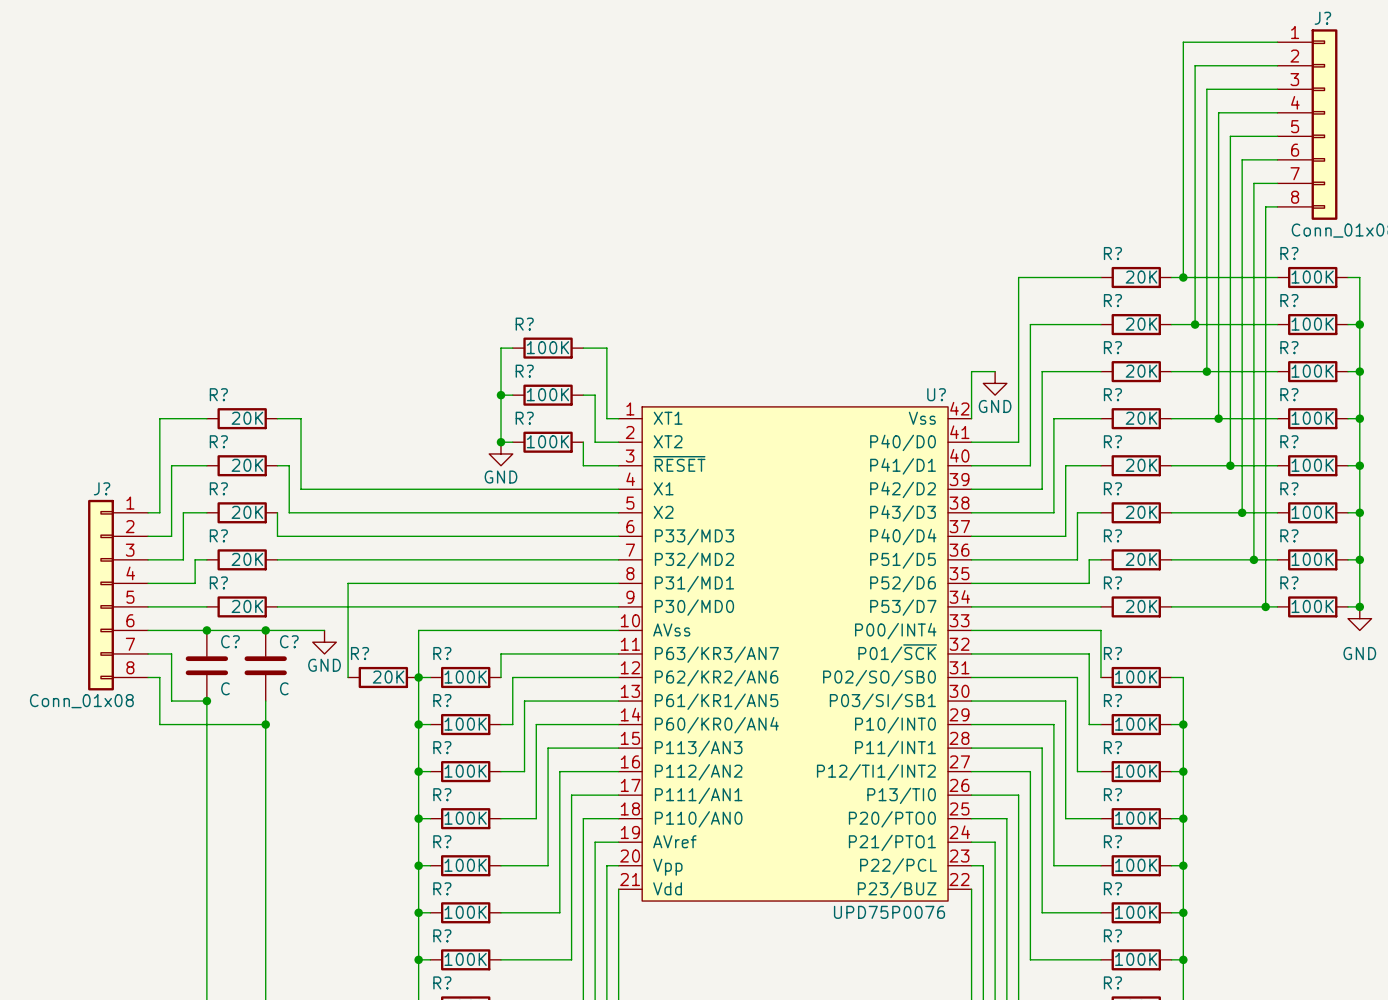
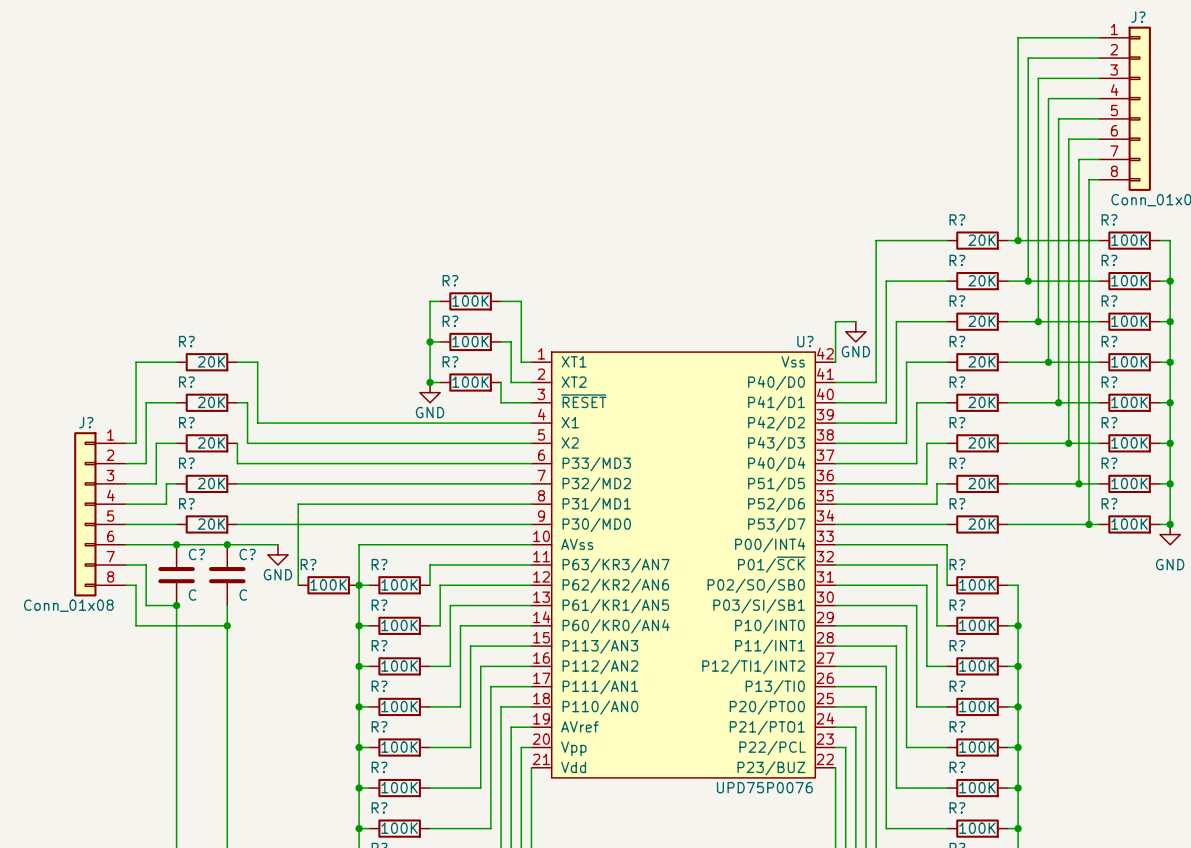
R? value: 20K (388, 677) -> 100K (328, 584)

